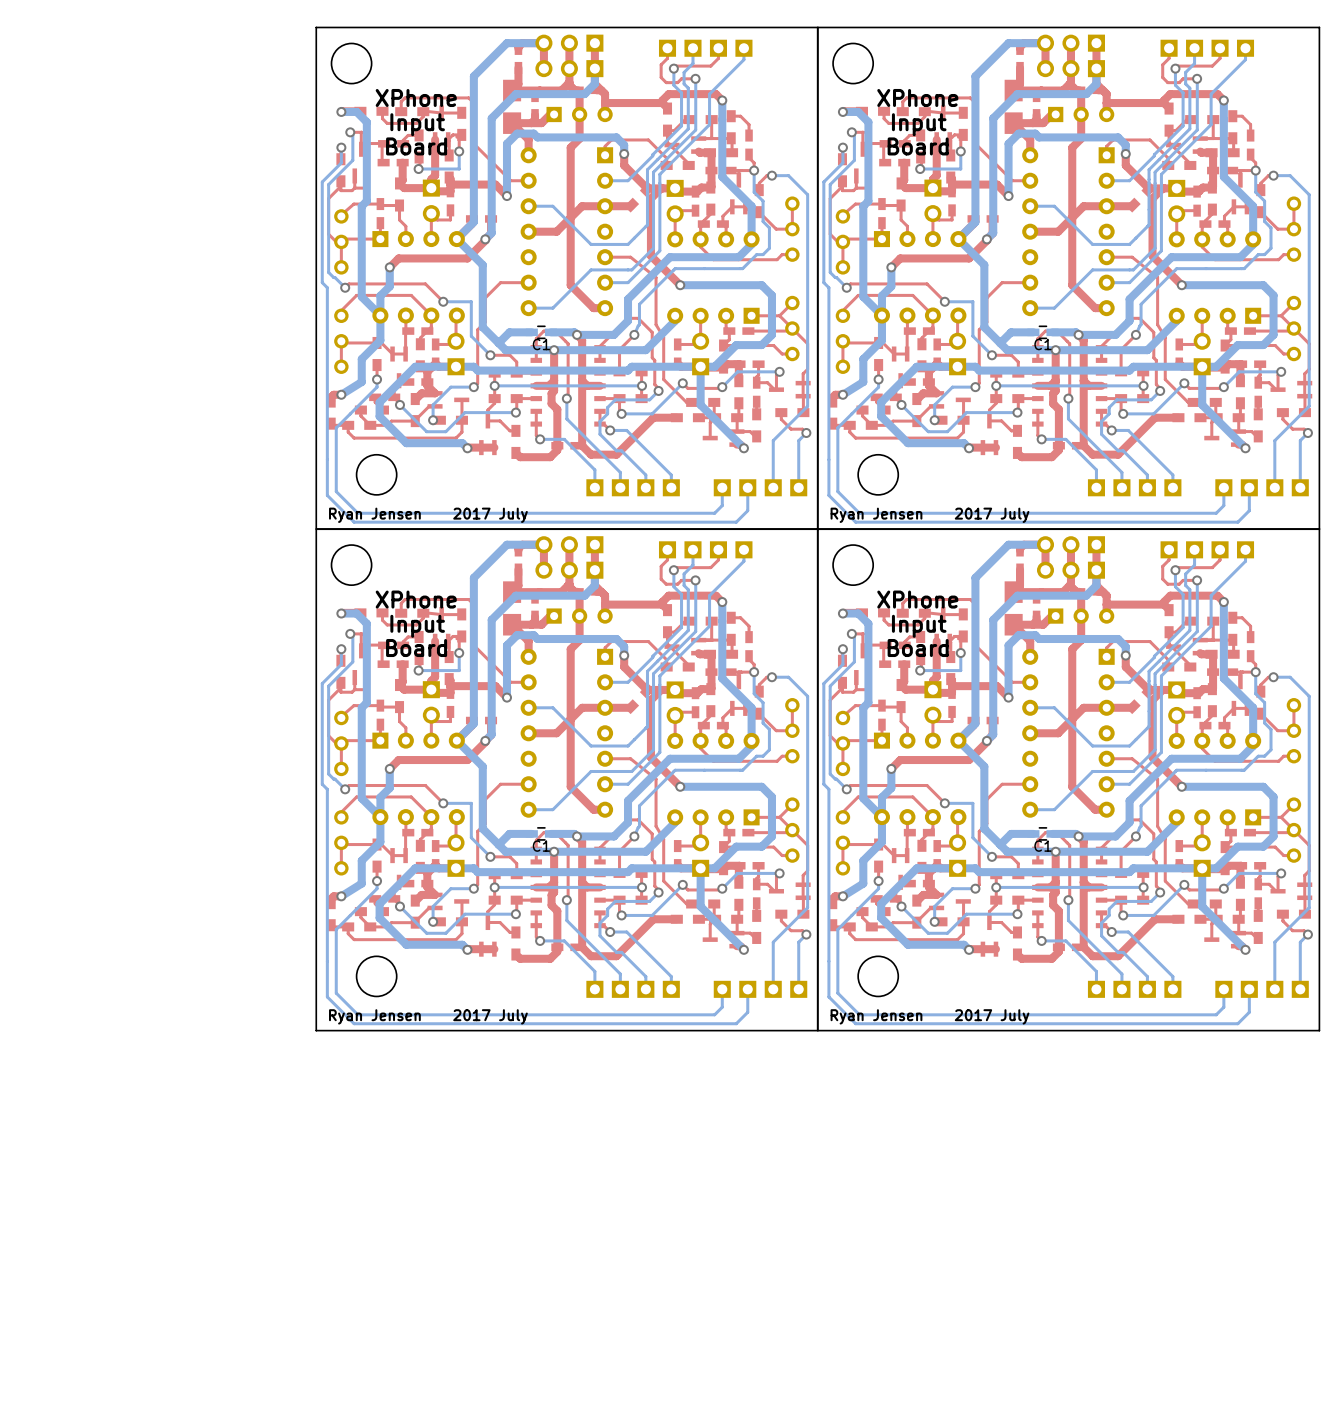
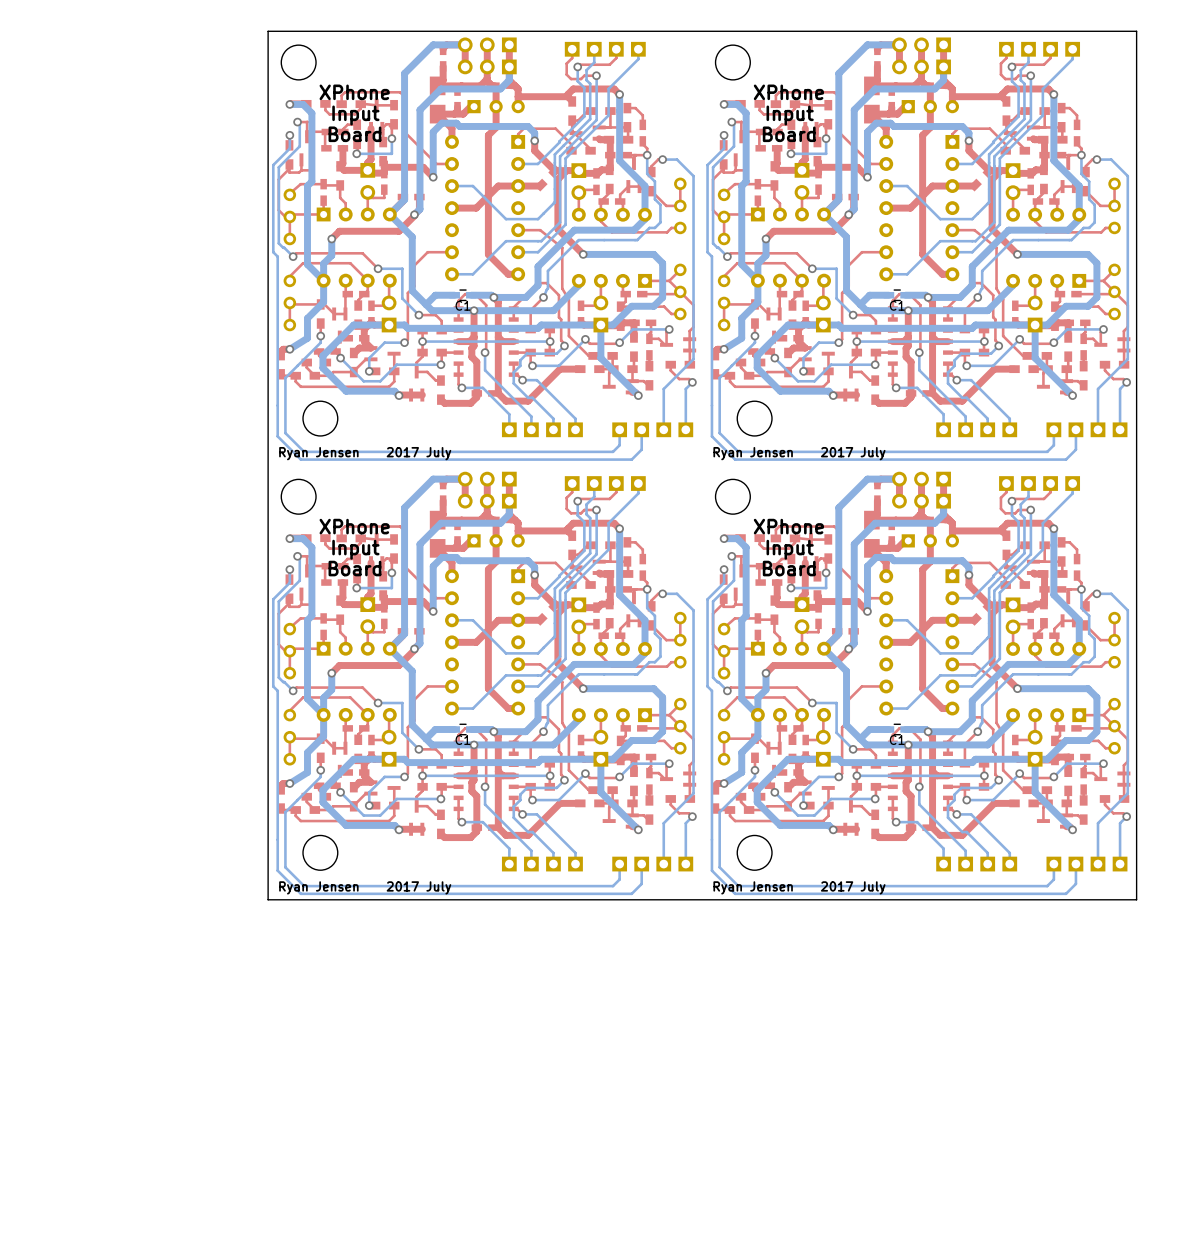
line: (817, 27) (817, 1030) -> none
line: (1319, 529) (316, 529) -> none

